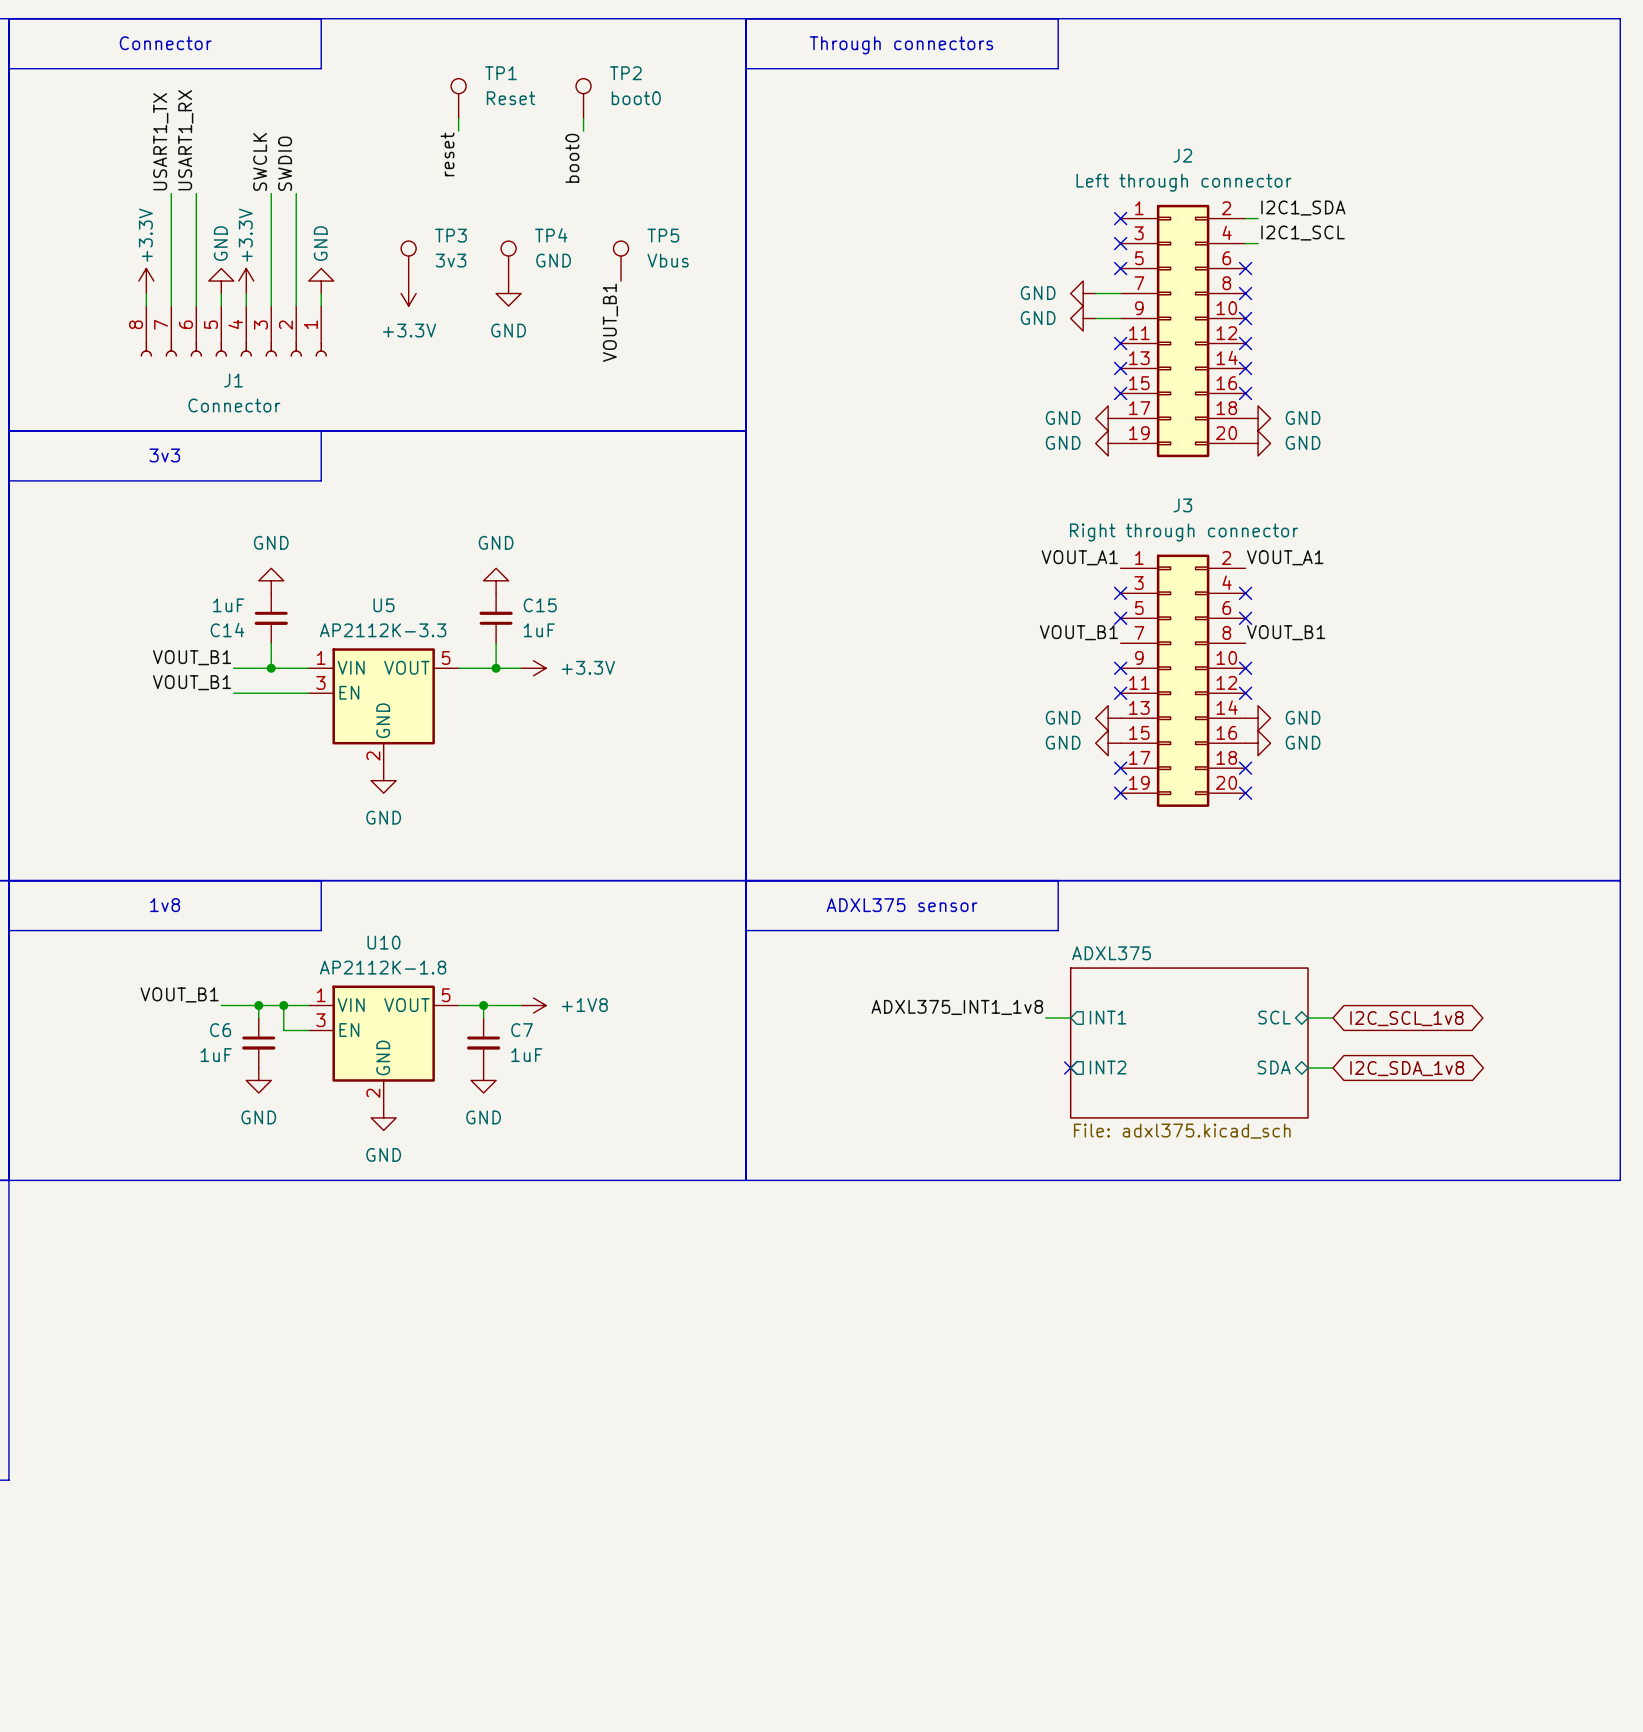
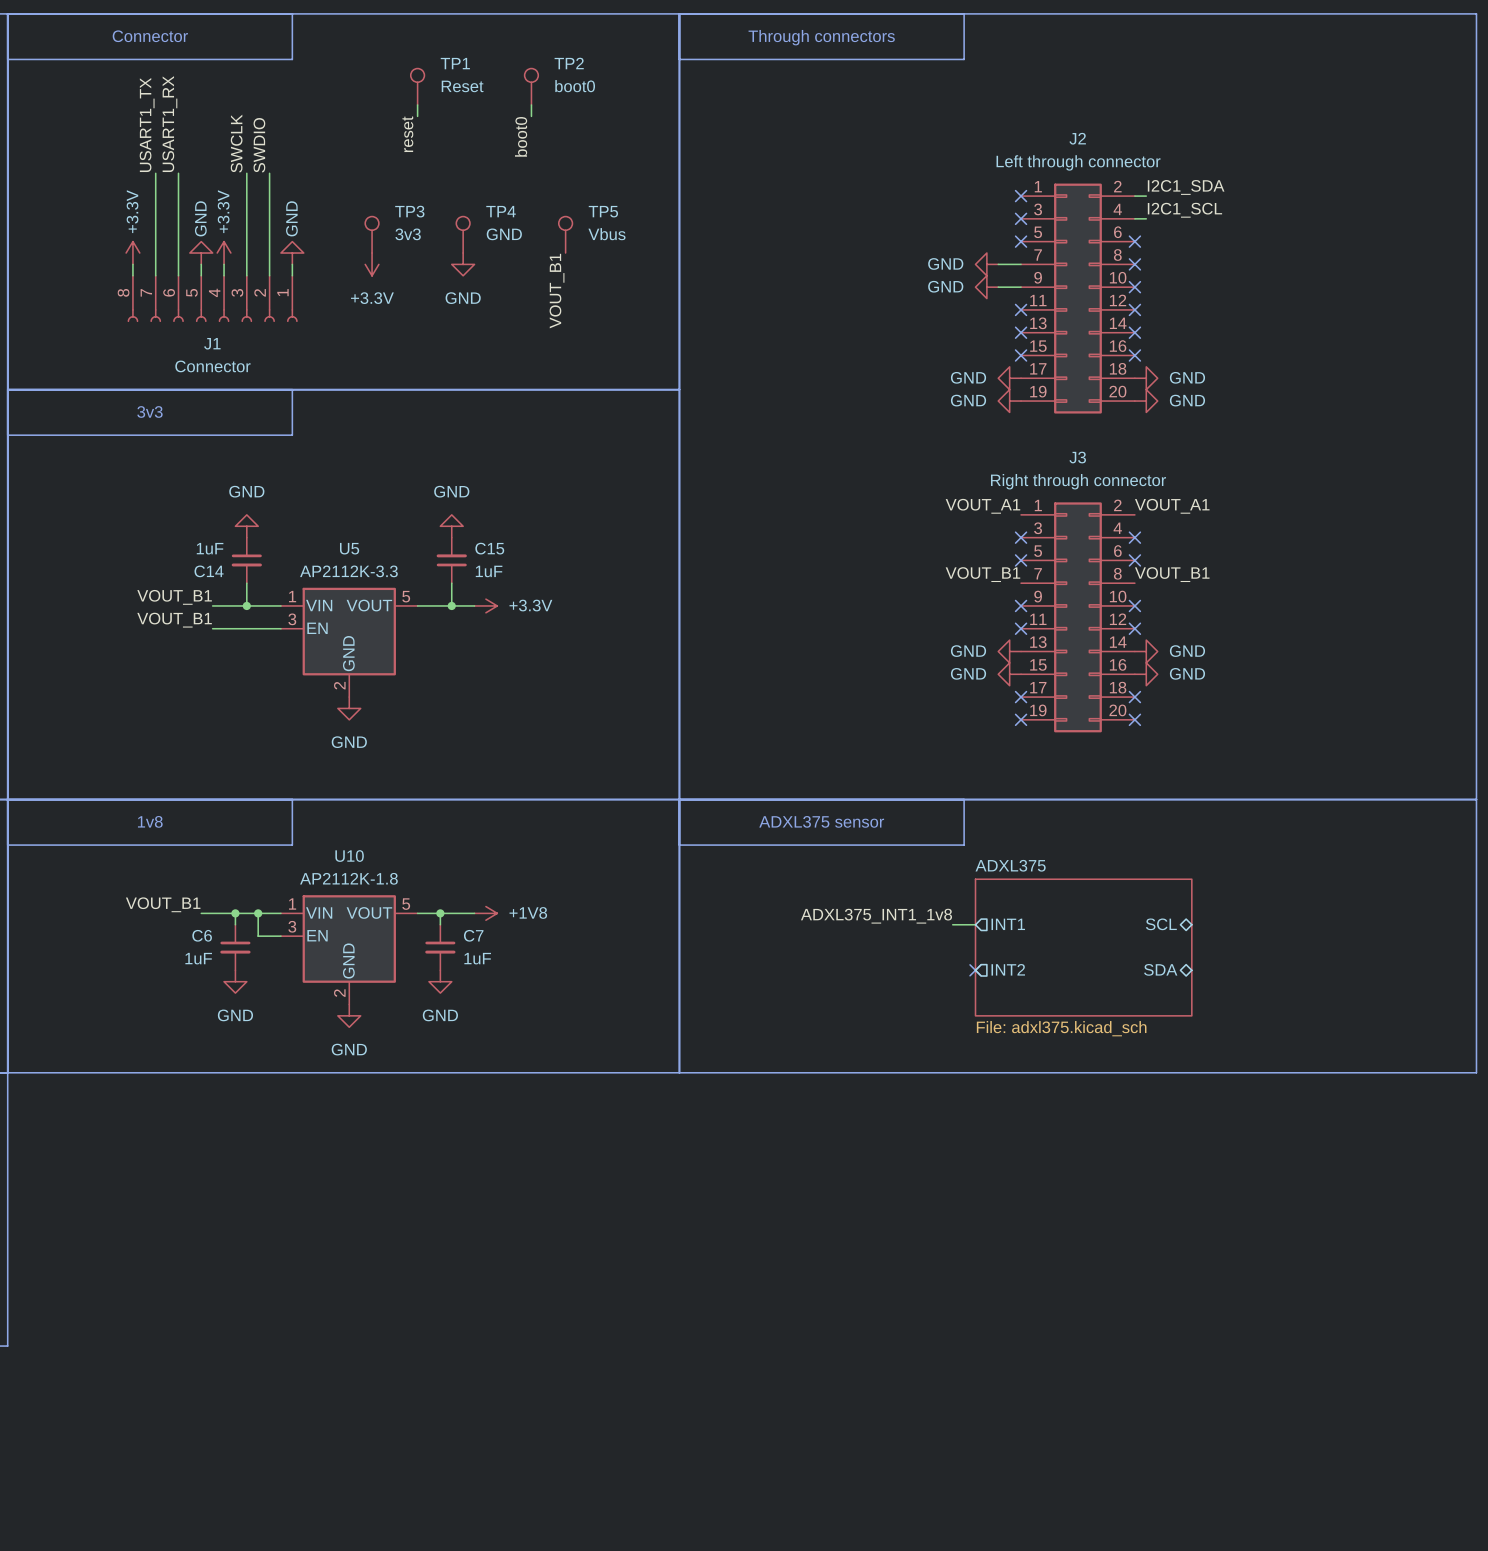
wire: (1308, 1018) (1332, 1018) -> none
global label: I2C_SCL_1v8 (1406, 1018) -> none
wire: (1308, 1067) (1332, 1067) -> none
global label: I2C_SDA_1v8 (1407, 1068) -> none

